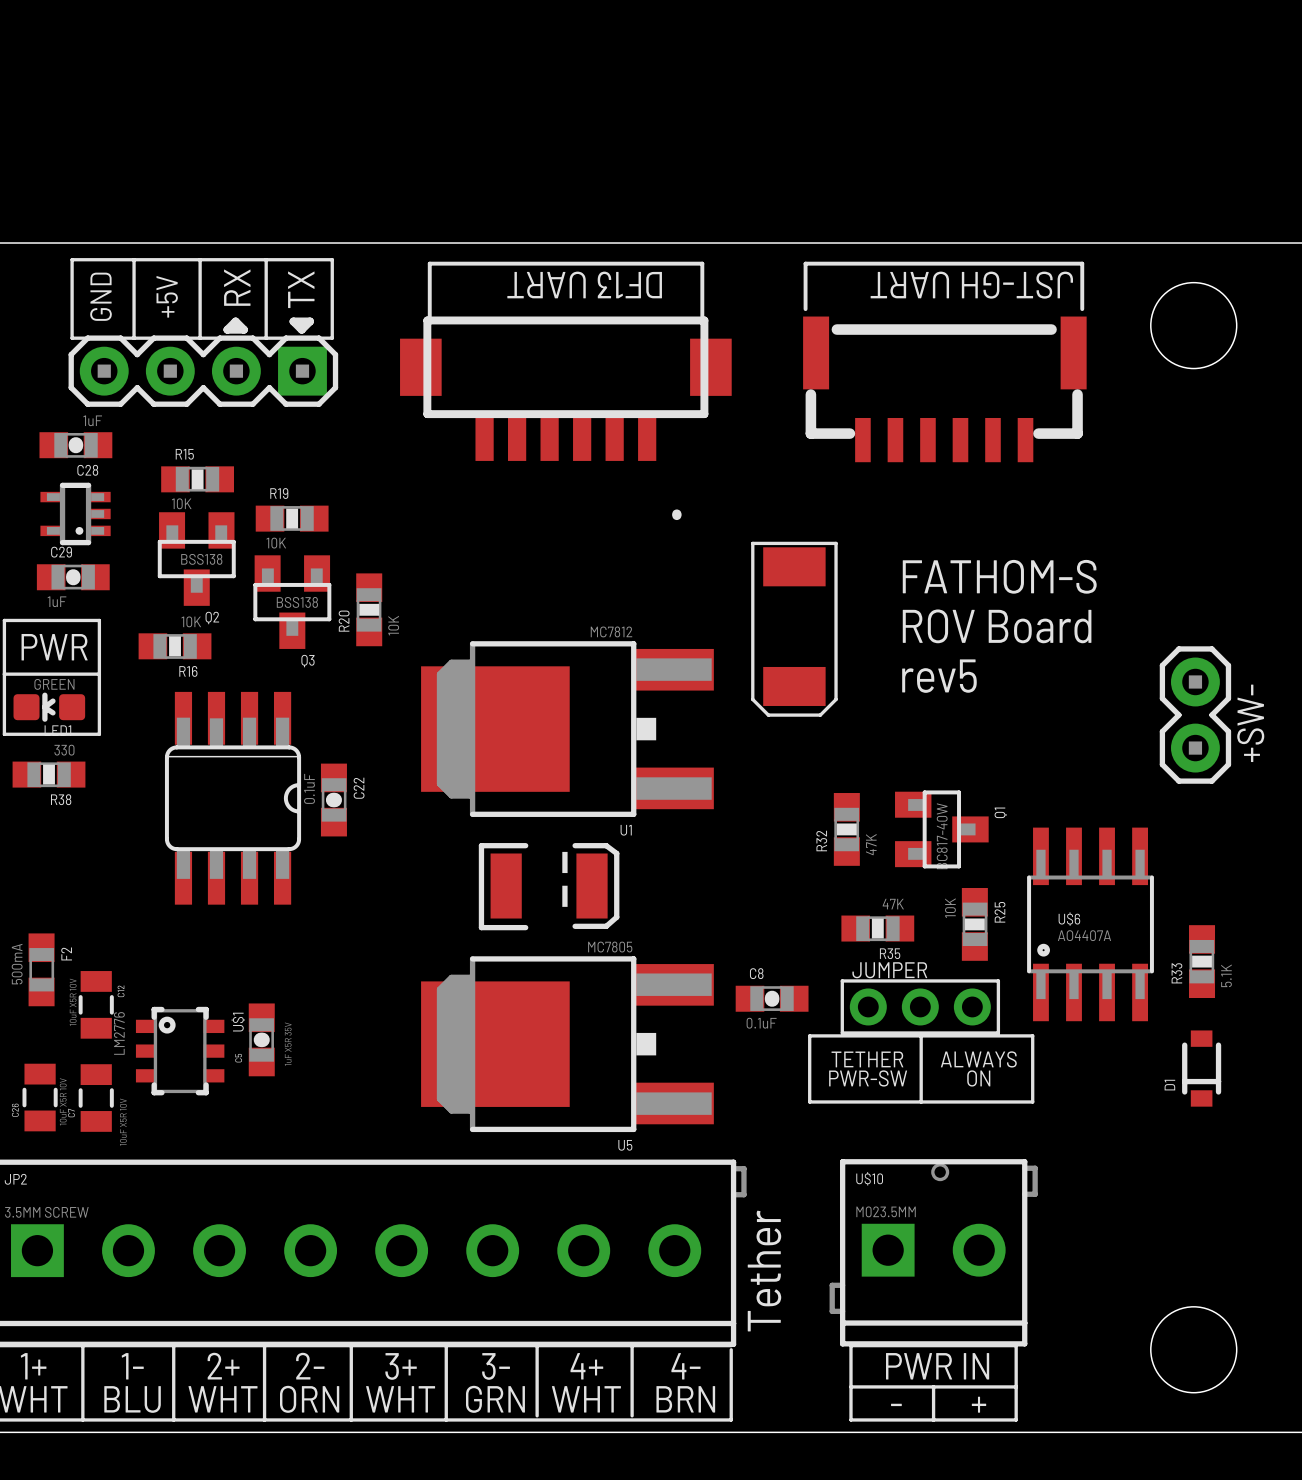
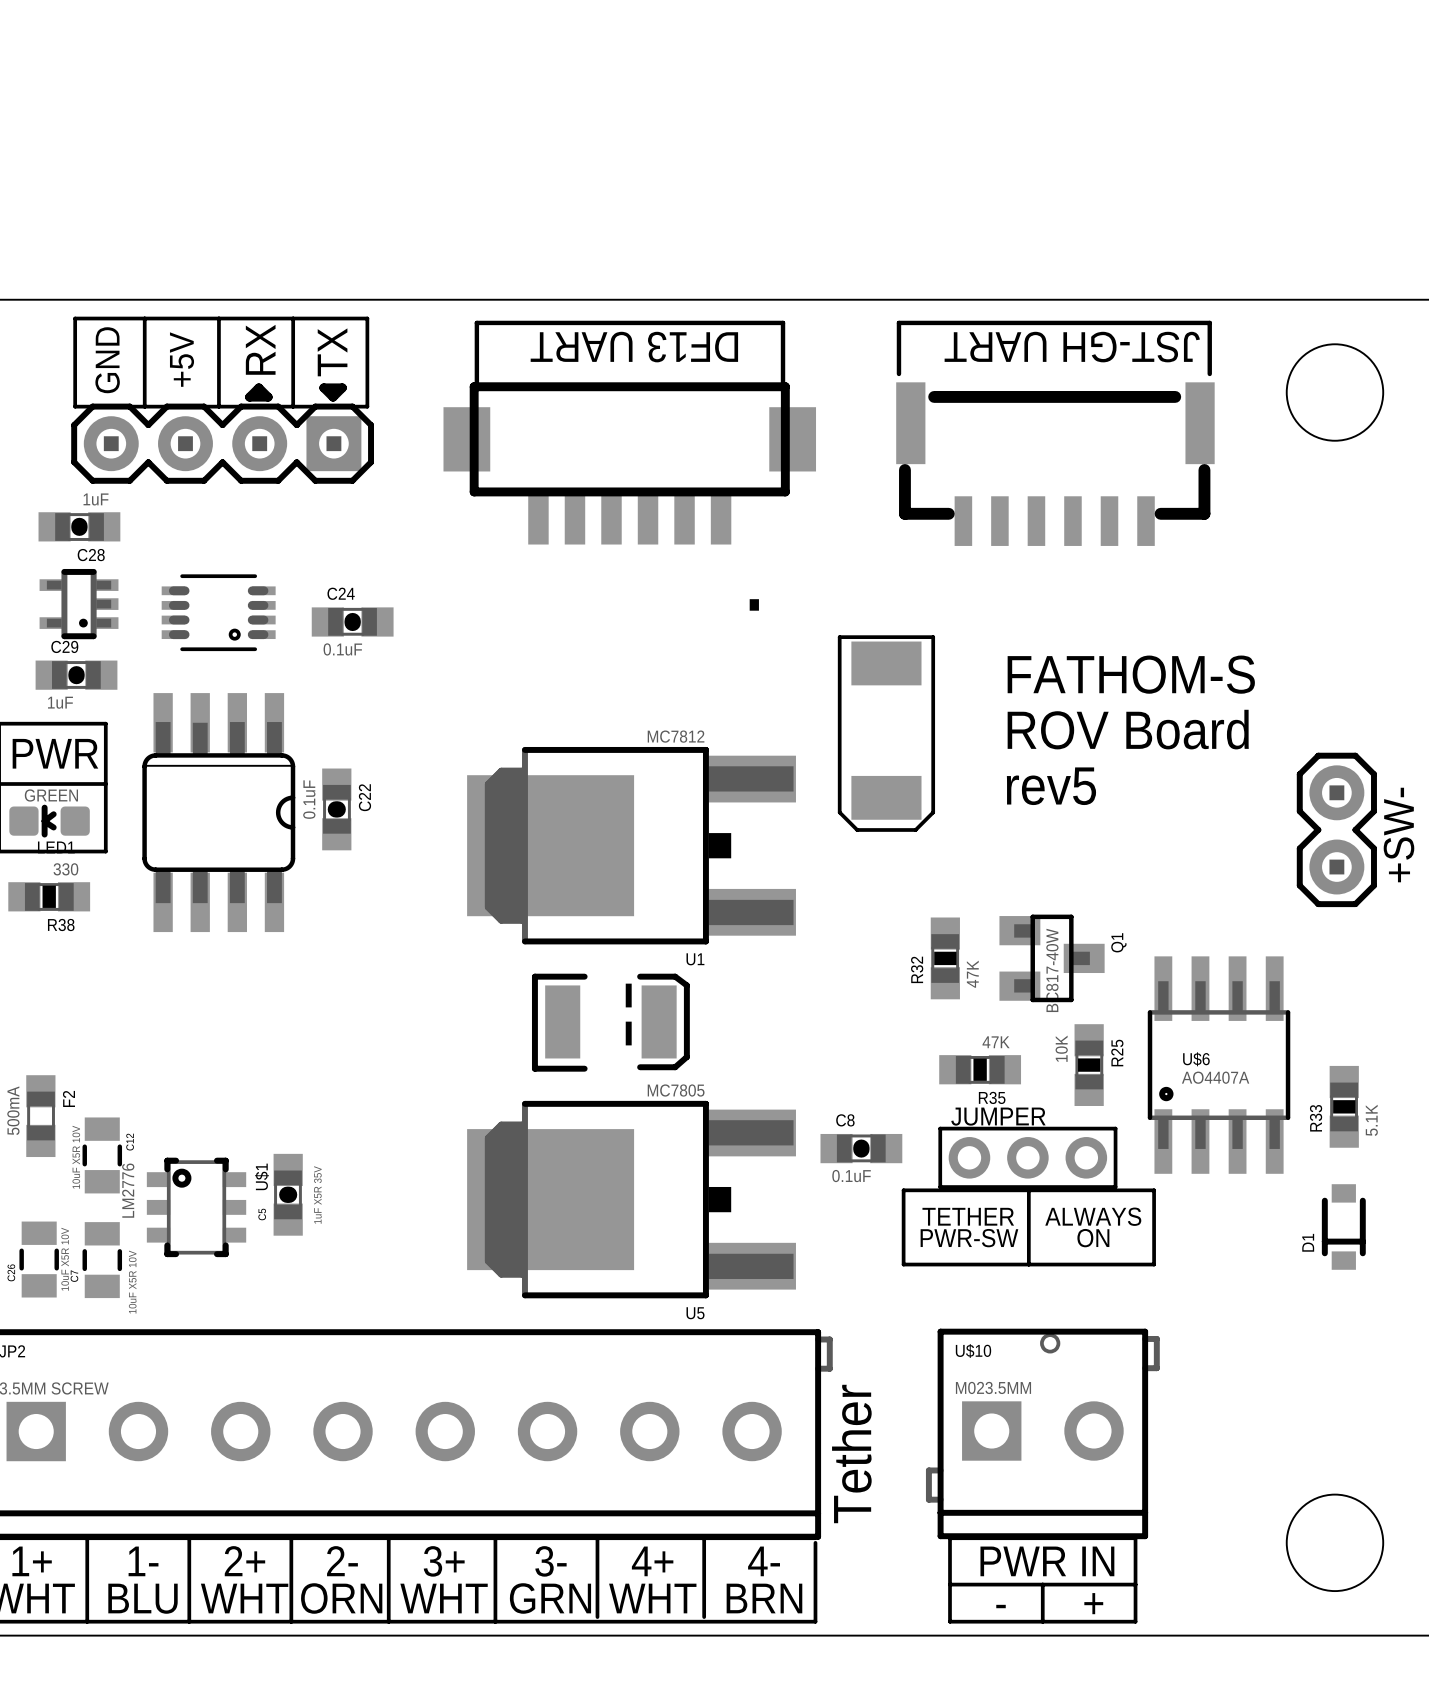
R15: 10K (197, 479) -> none
R19: 10K (292, 518) -> none
part: none -> (218, 612)
C24: none -> 0.1uF (352, 621)
Q2: BSS138 (196, 559) -> none
Q3: BSS138 (292, 602) -> none
R20: 10K (369, 609) -> none
R16: 10K (175, 646) -> none
part position: (233, 798) -> (218, 812)
C22 position: (333, 800) -> (336, 809)

